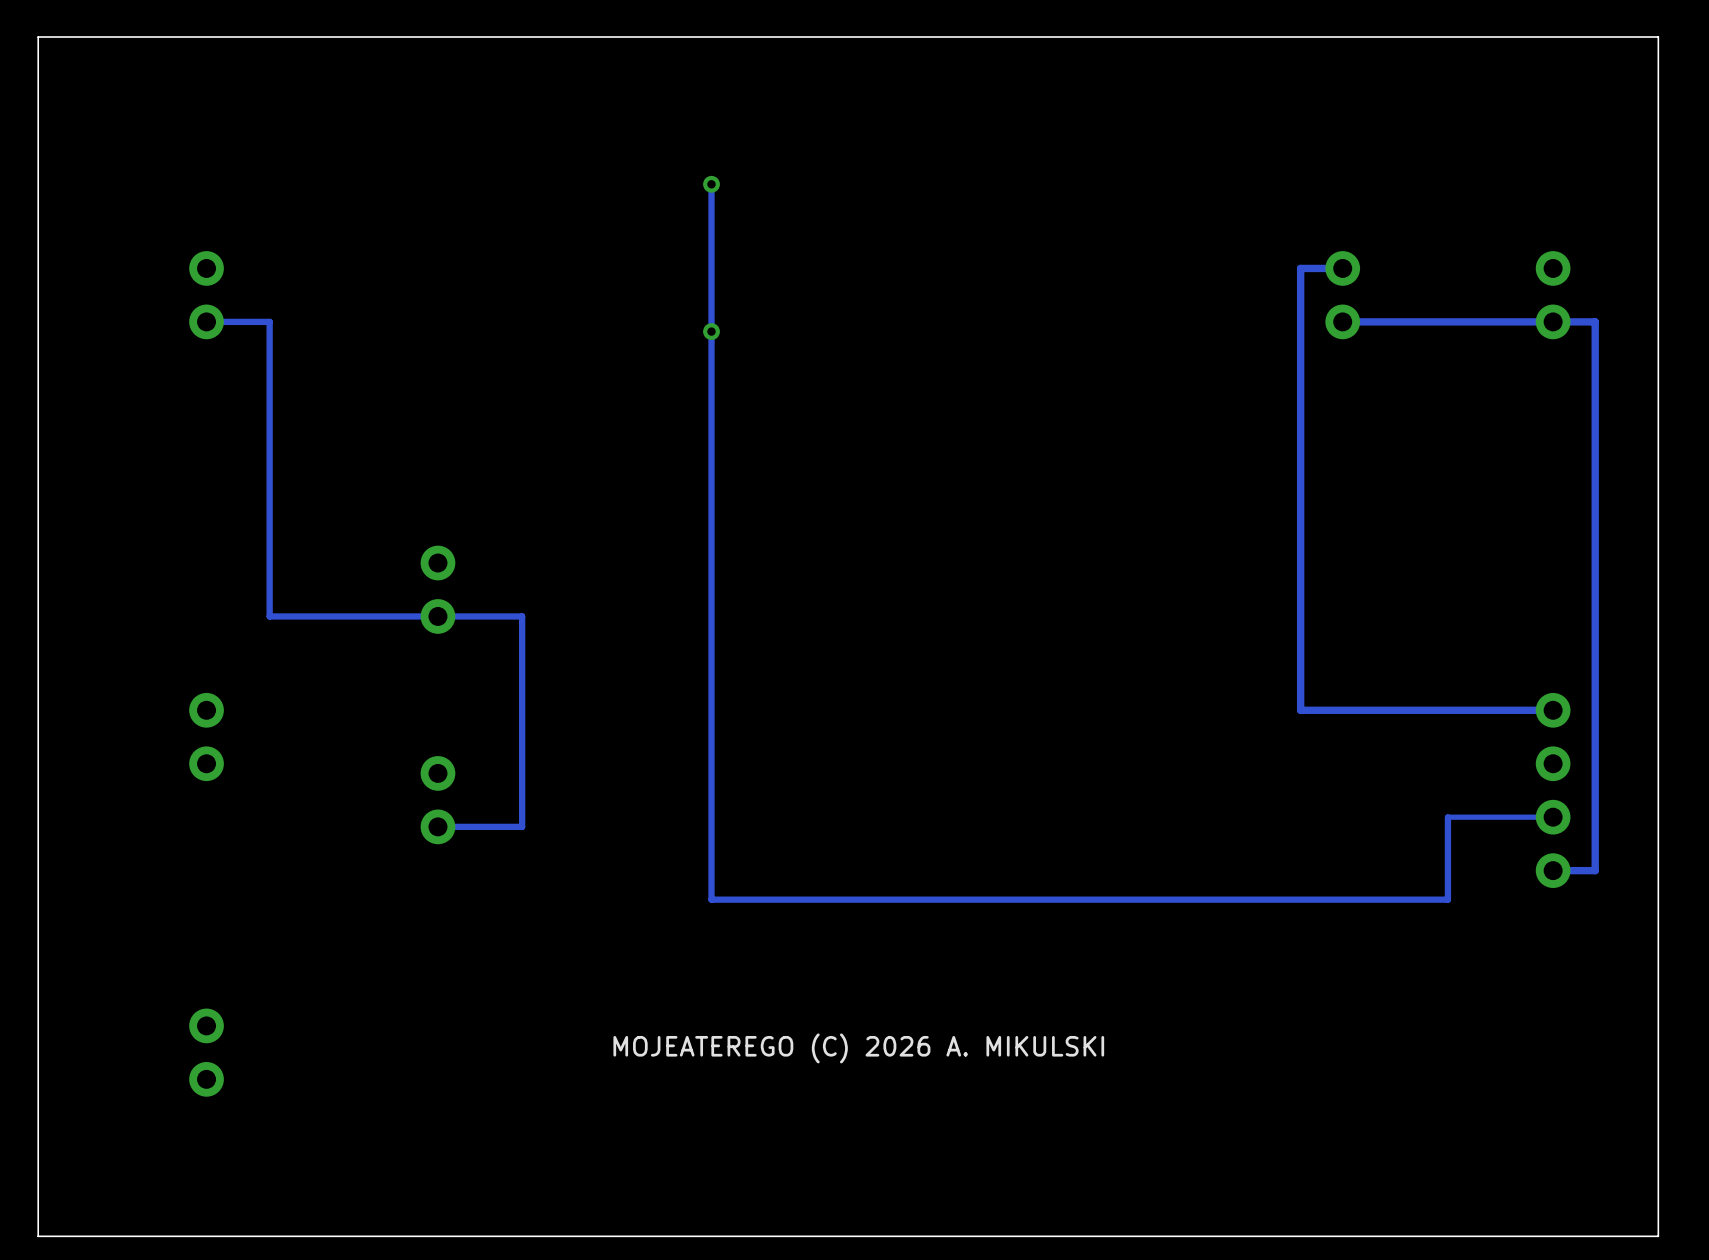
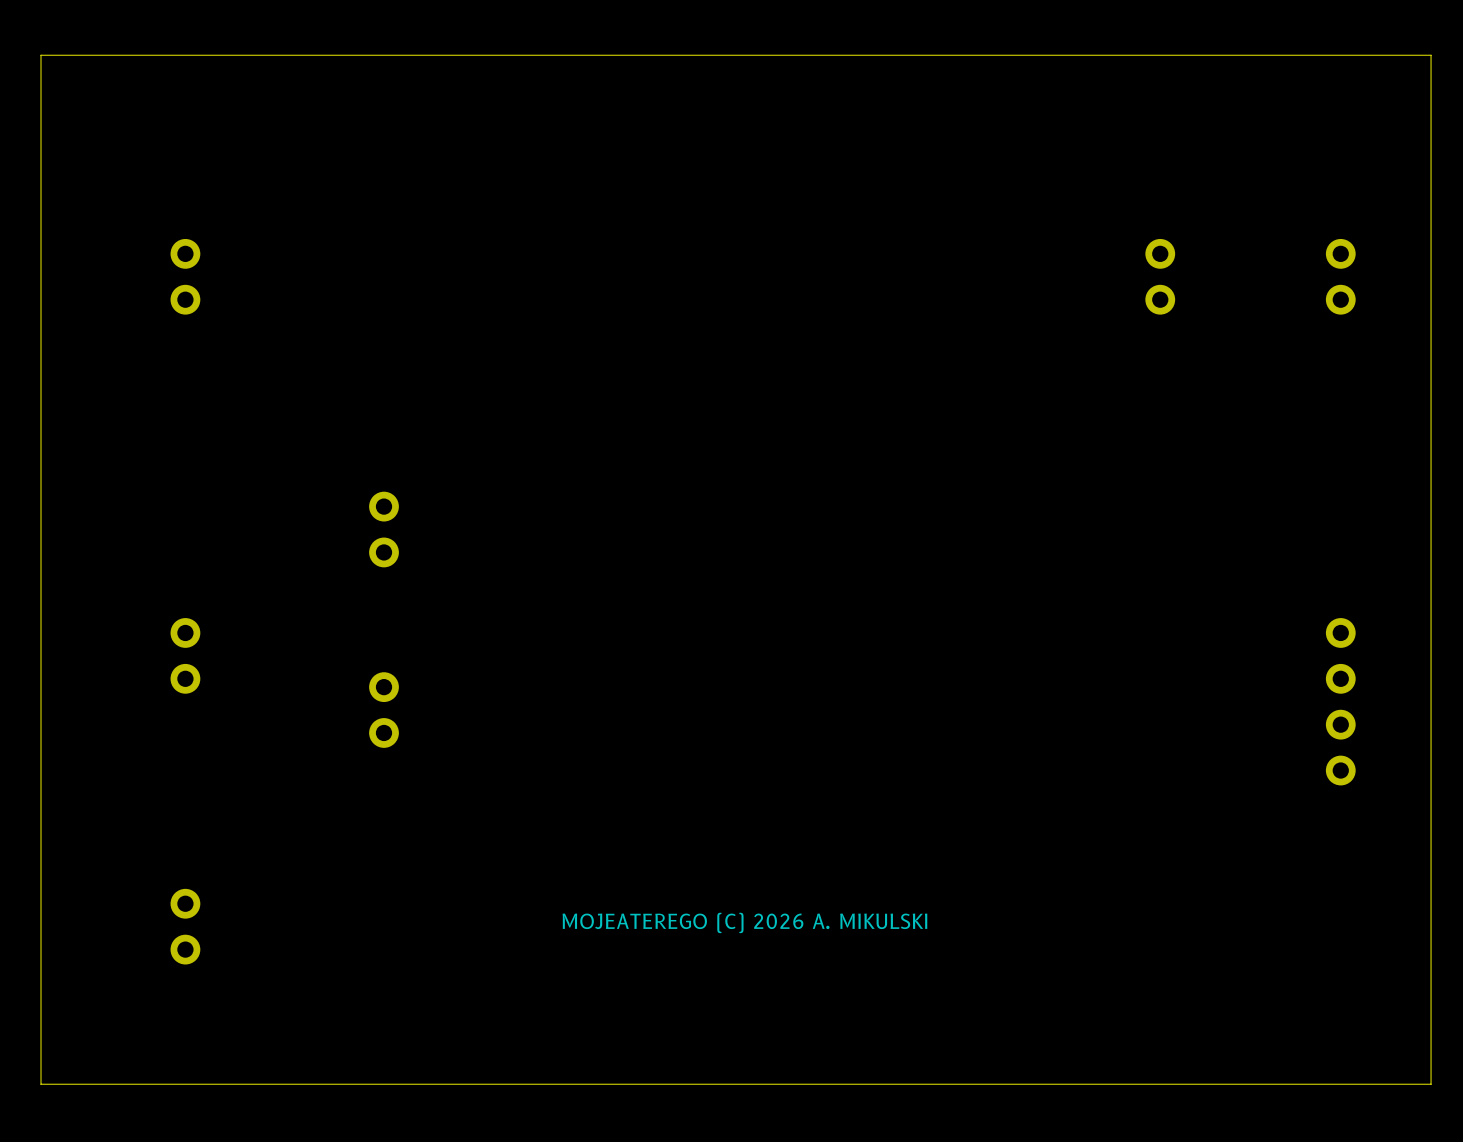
track: (711, 184) (711, 899) (1447, 899) (1447, 817) (1553, 817) -> none
via: (711, 184) -> none
track: (1342, 268) (1300, 268) (1300, 710) (1553, 710) -> none
track: (206, 321) (269, 321) (269, 616) (522, 616) (522, 826) (437, 826) -> none
track: (1342, 321) (1595, 321) (1595, 870) (1553, 870) -> none
via: (711, 331) -> none

